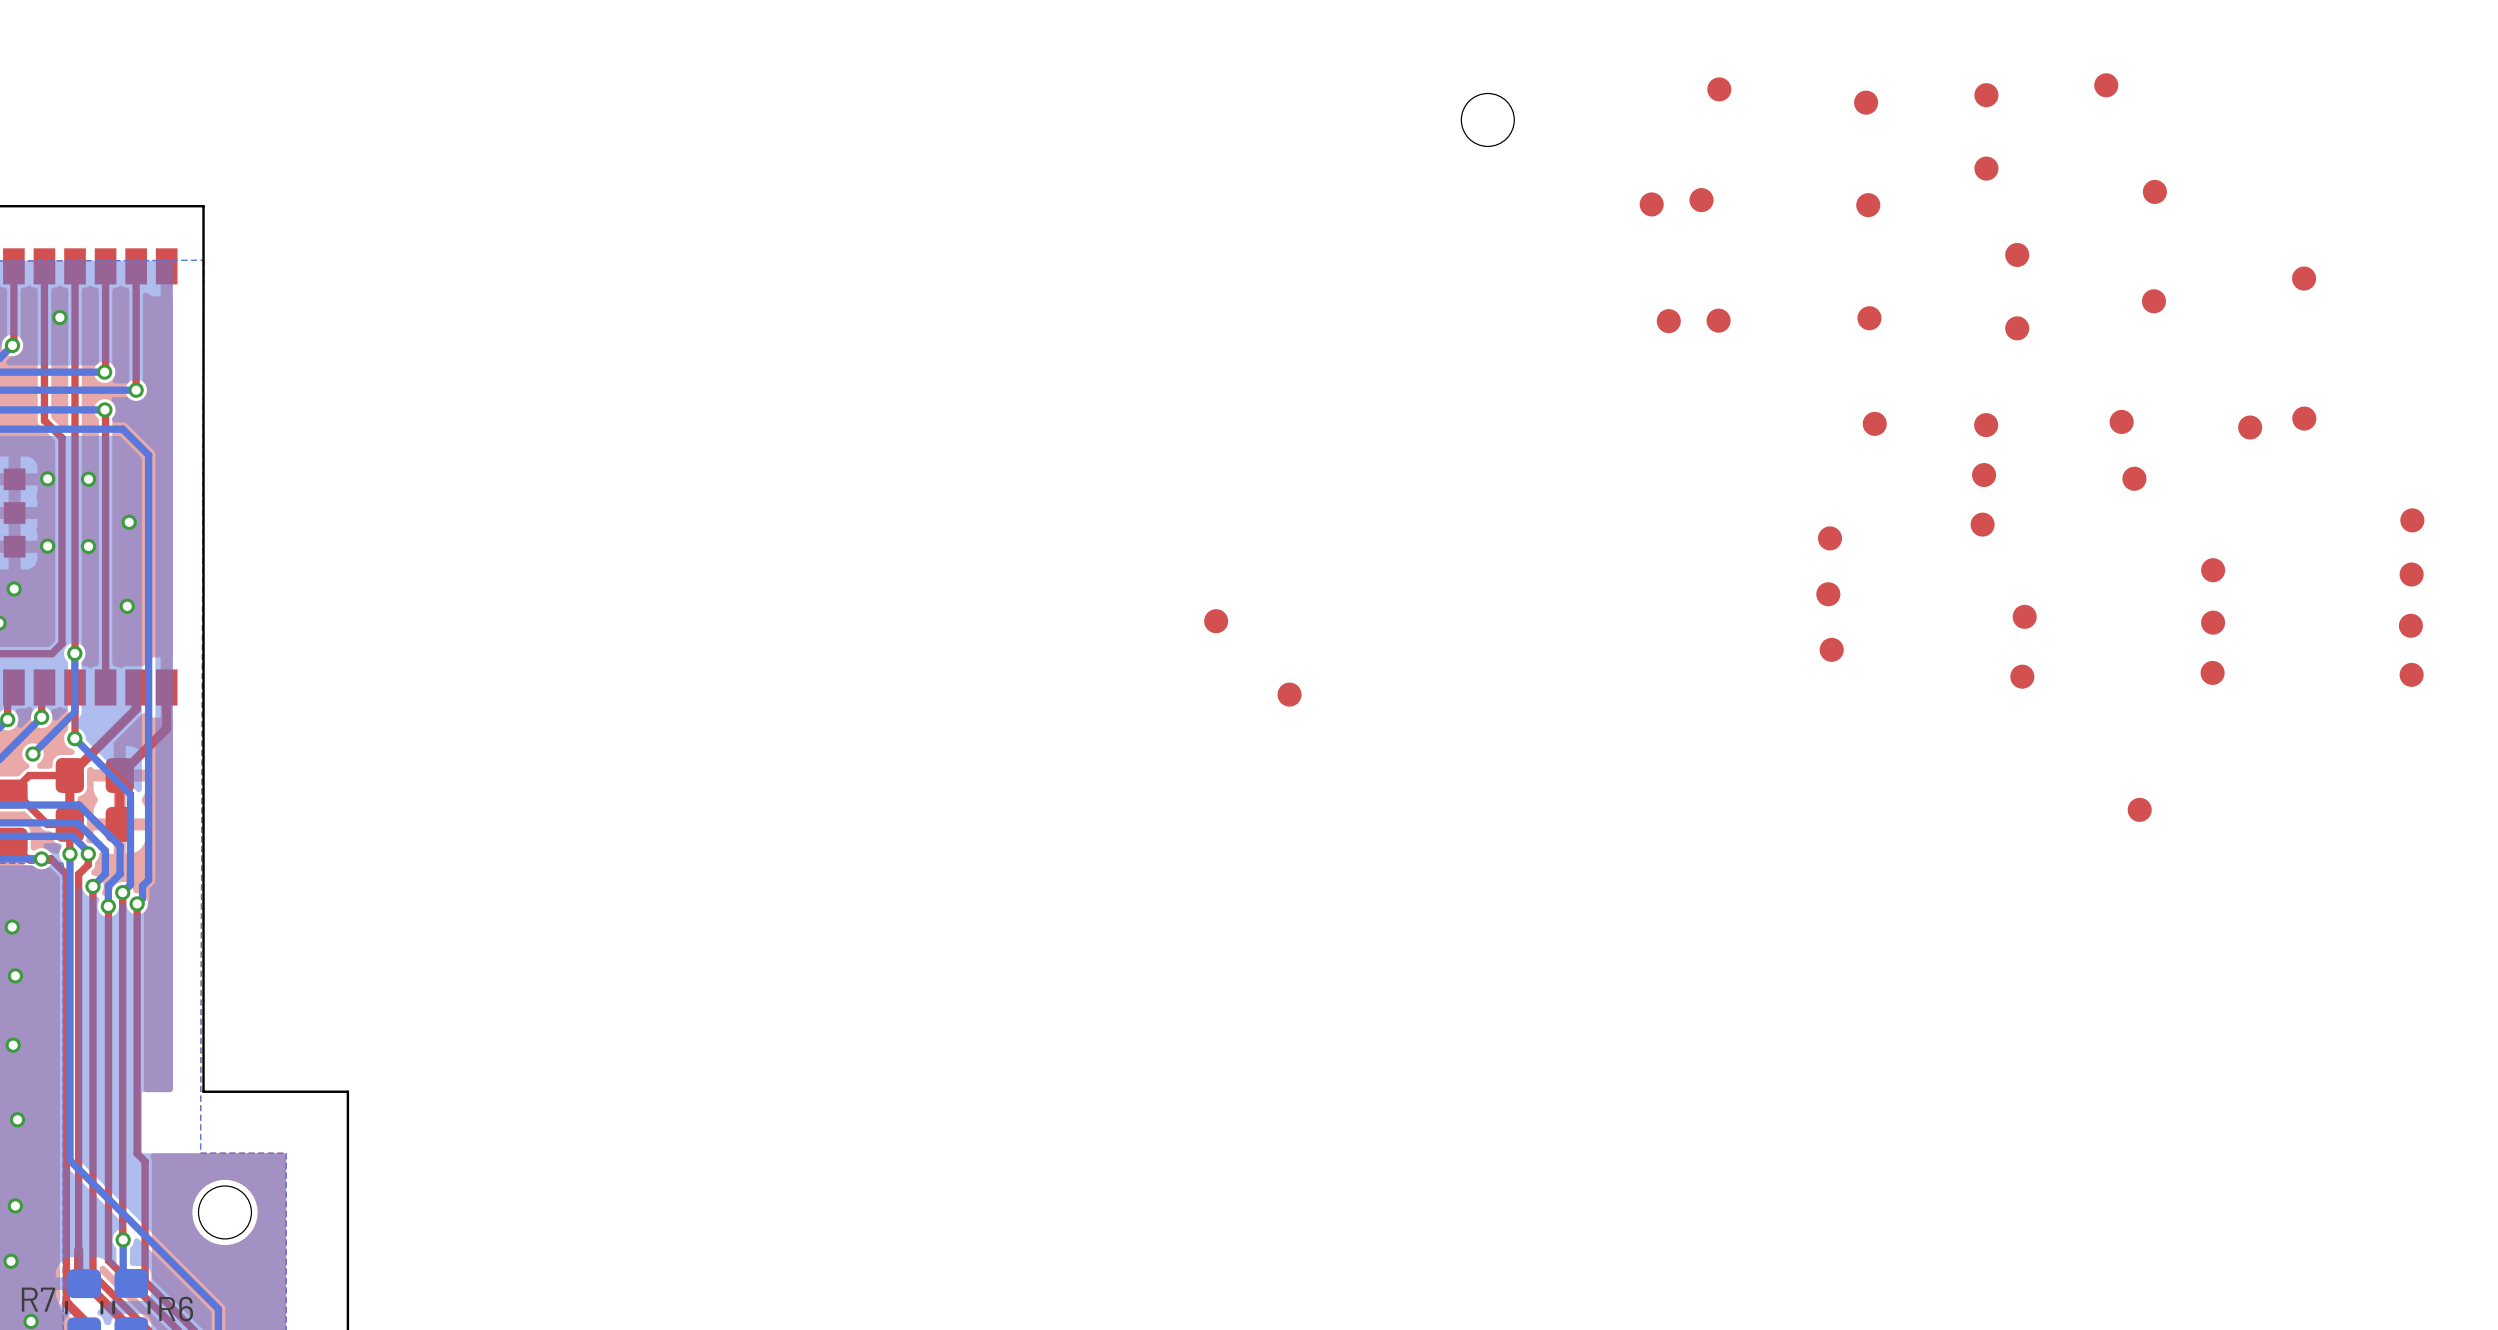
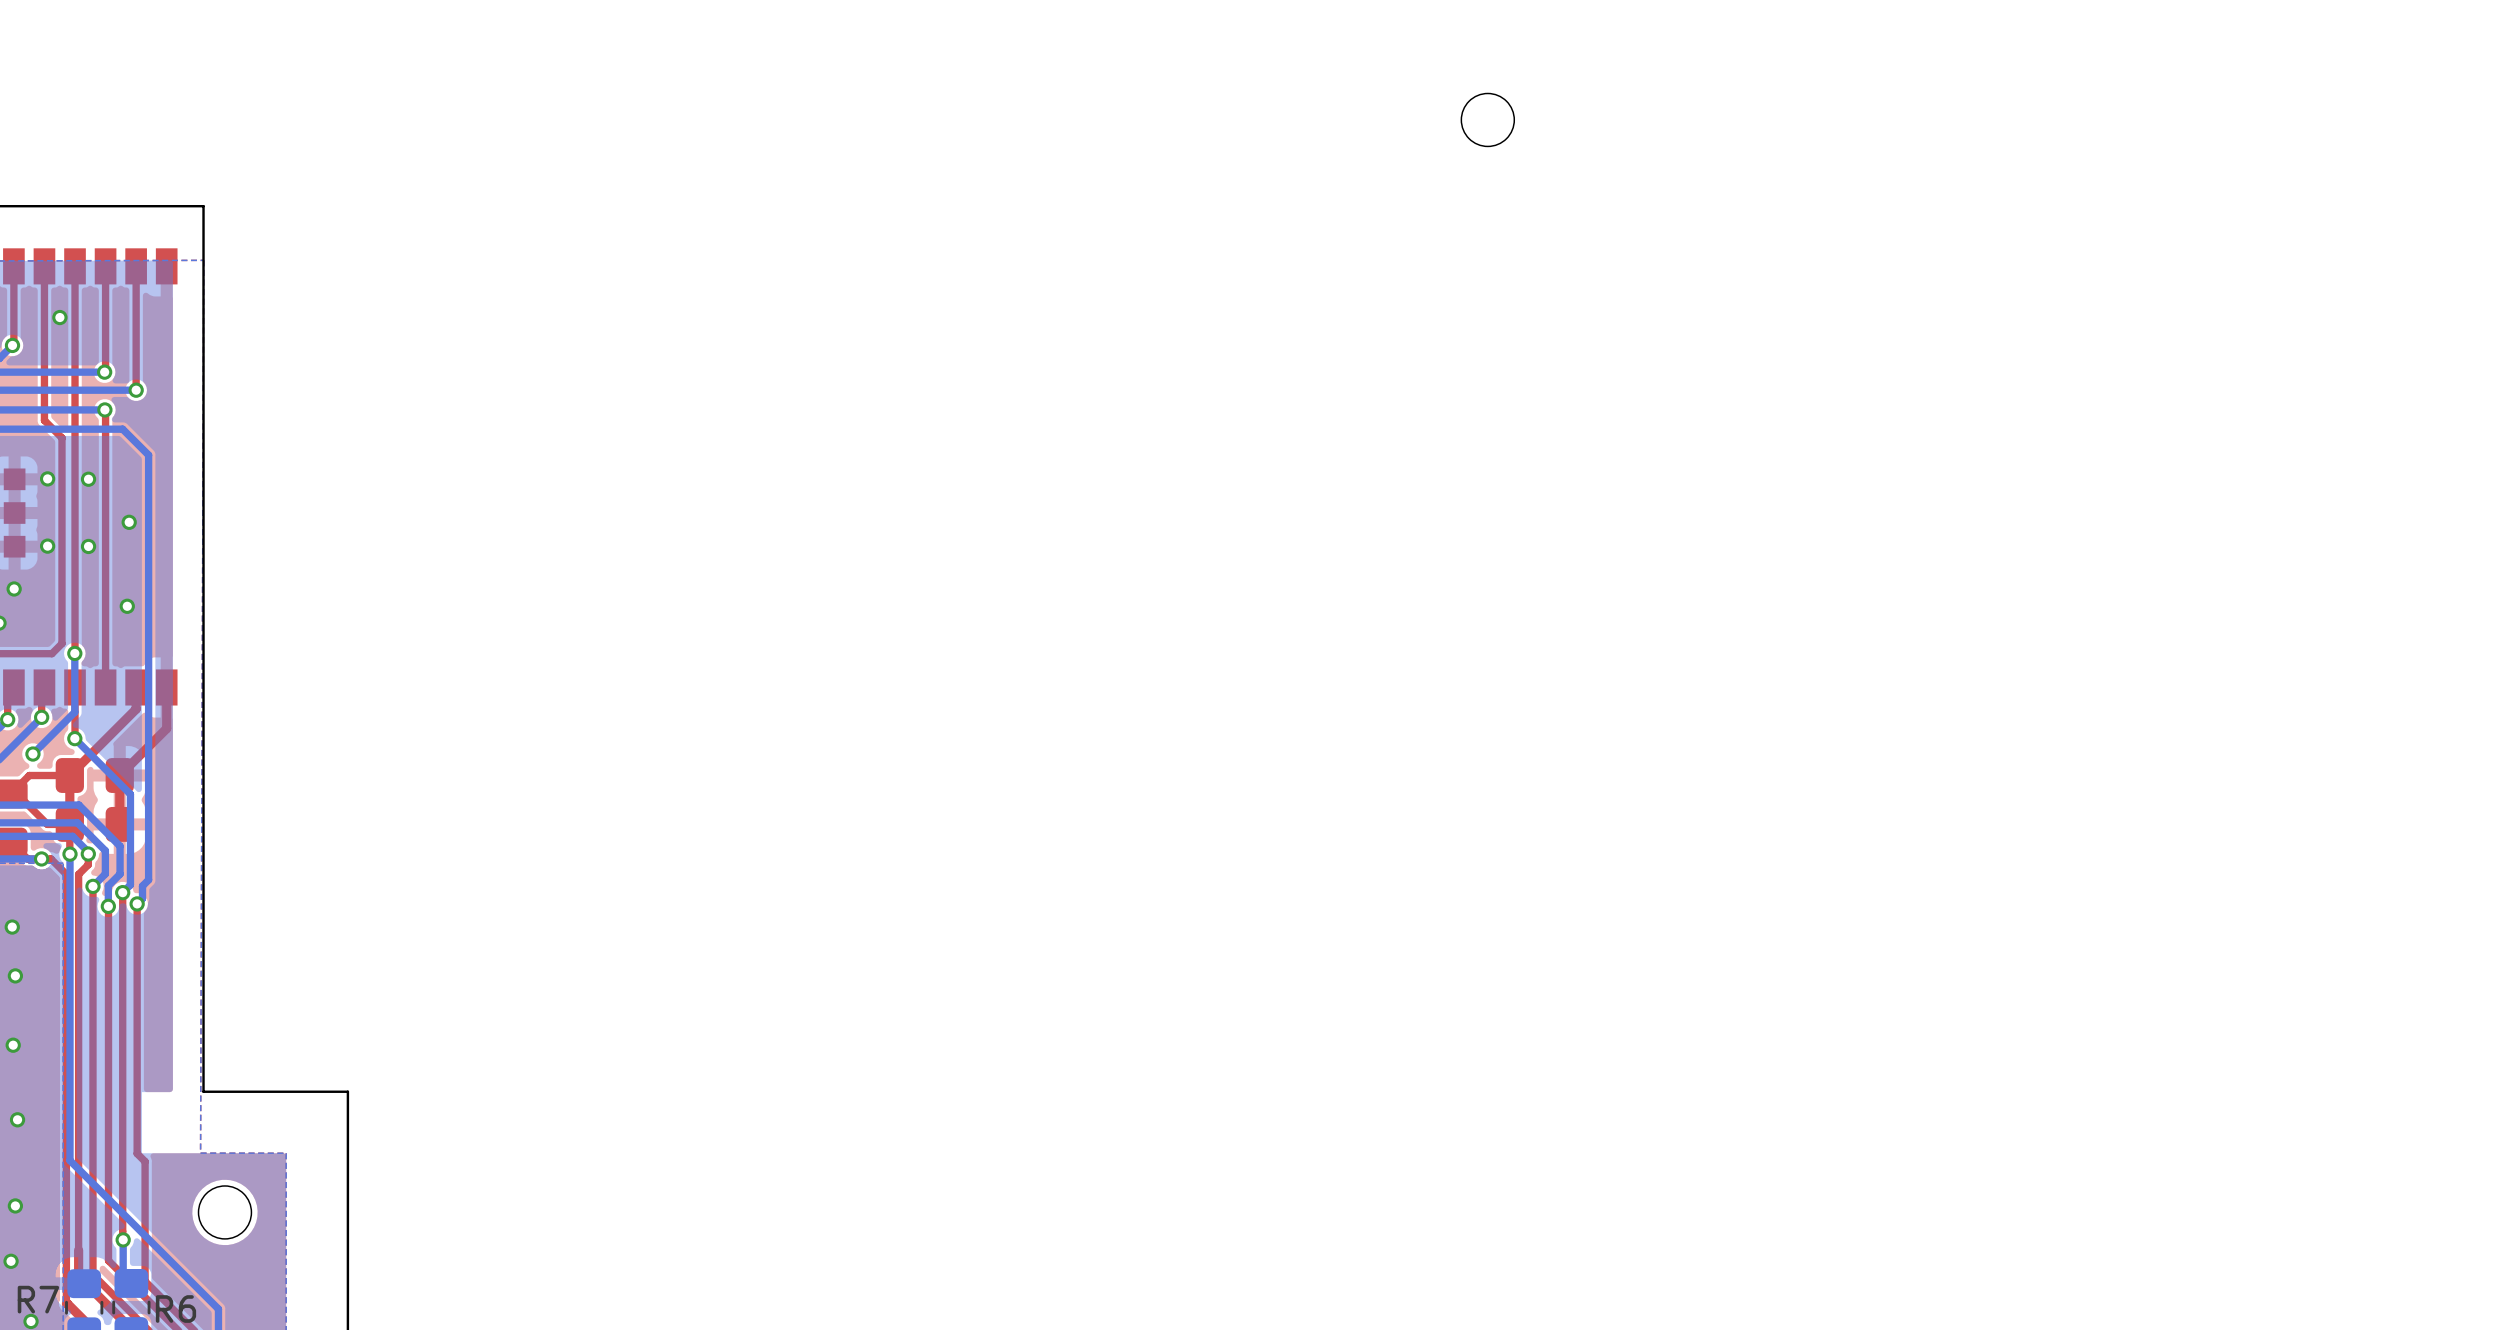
part: (2106, 85) -> none
part: (1719, 89) -> none
part: (1986, 95) -> none
part: (1866, 102) -> none
part: (1986, 168) -> none
part: (2154, 191) -> none
part: (1701, 200) -> none
part: (1651, 204) -> none
part: (1868, 205) -> none
part: (2017, 254) -> none
part: (2304, 278) -> none
part: (2153, 301) -> none
part: (1869, 318) -> none
part: (1718, 320) -> none
part: (1668, 321) -> none
part: (2017, 328) -> none
part: (2304, 418) -> none
part: (2121, 421) -> none
part: (1874, 423) -> none
part: (1986, 425) -> none
part: (2250, 427) -> none
part: (1984, 475) -> none
part: (2134, 478) -> none
part: (2412, 520) -> none
part: (1982, 524) -> none
part: (1830, 538) -> none
part: (2213, 570) -> none
part: (2411, 574) -> none
part: (1828, 594) -> none
part: (2024, 616) -> none
part: (1216, 621) -> none
part: (2213, 622) -> none
part: (2410, 625) -> none
part: (1831, 649) -> none
part: (2212, 672) -> none
part: (2411, 674) -> none
part: (2022, 676) -> none
part: (1289, 694) -> none
part: (2139, 809) -> none

